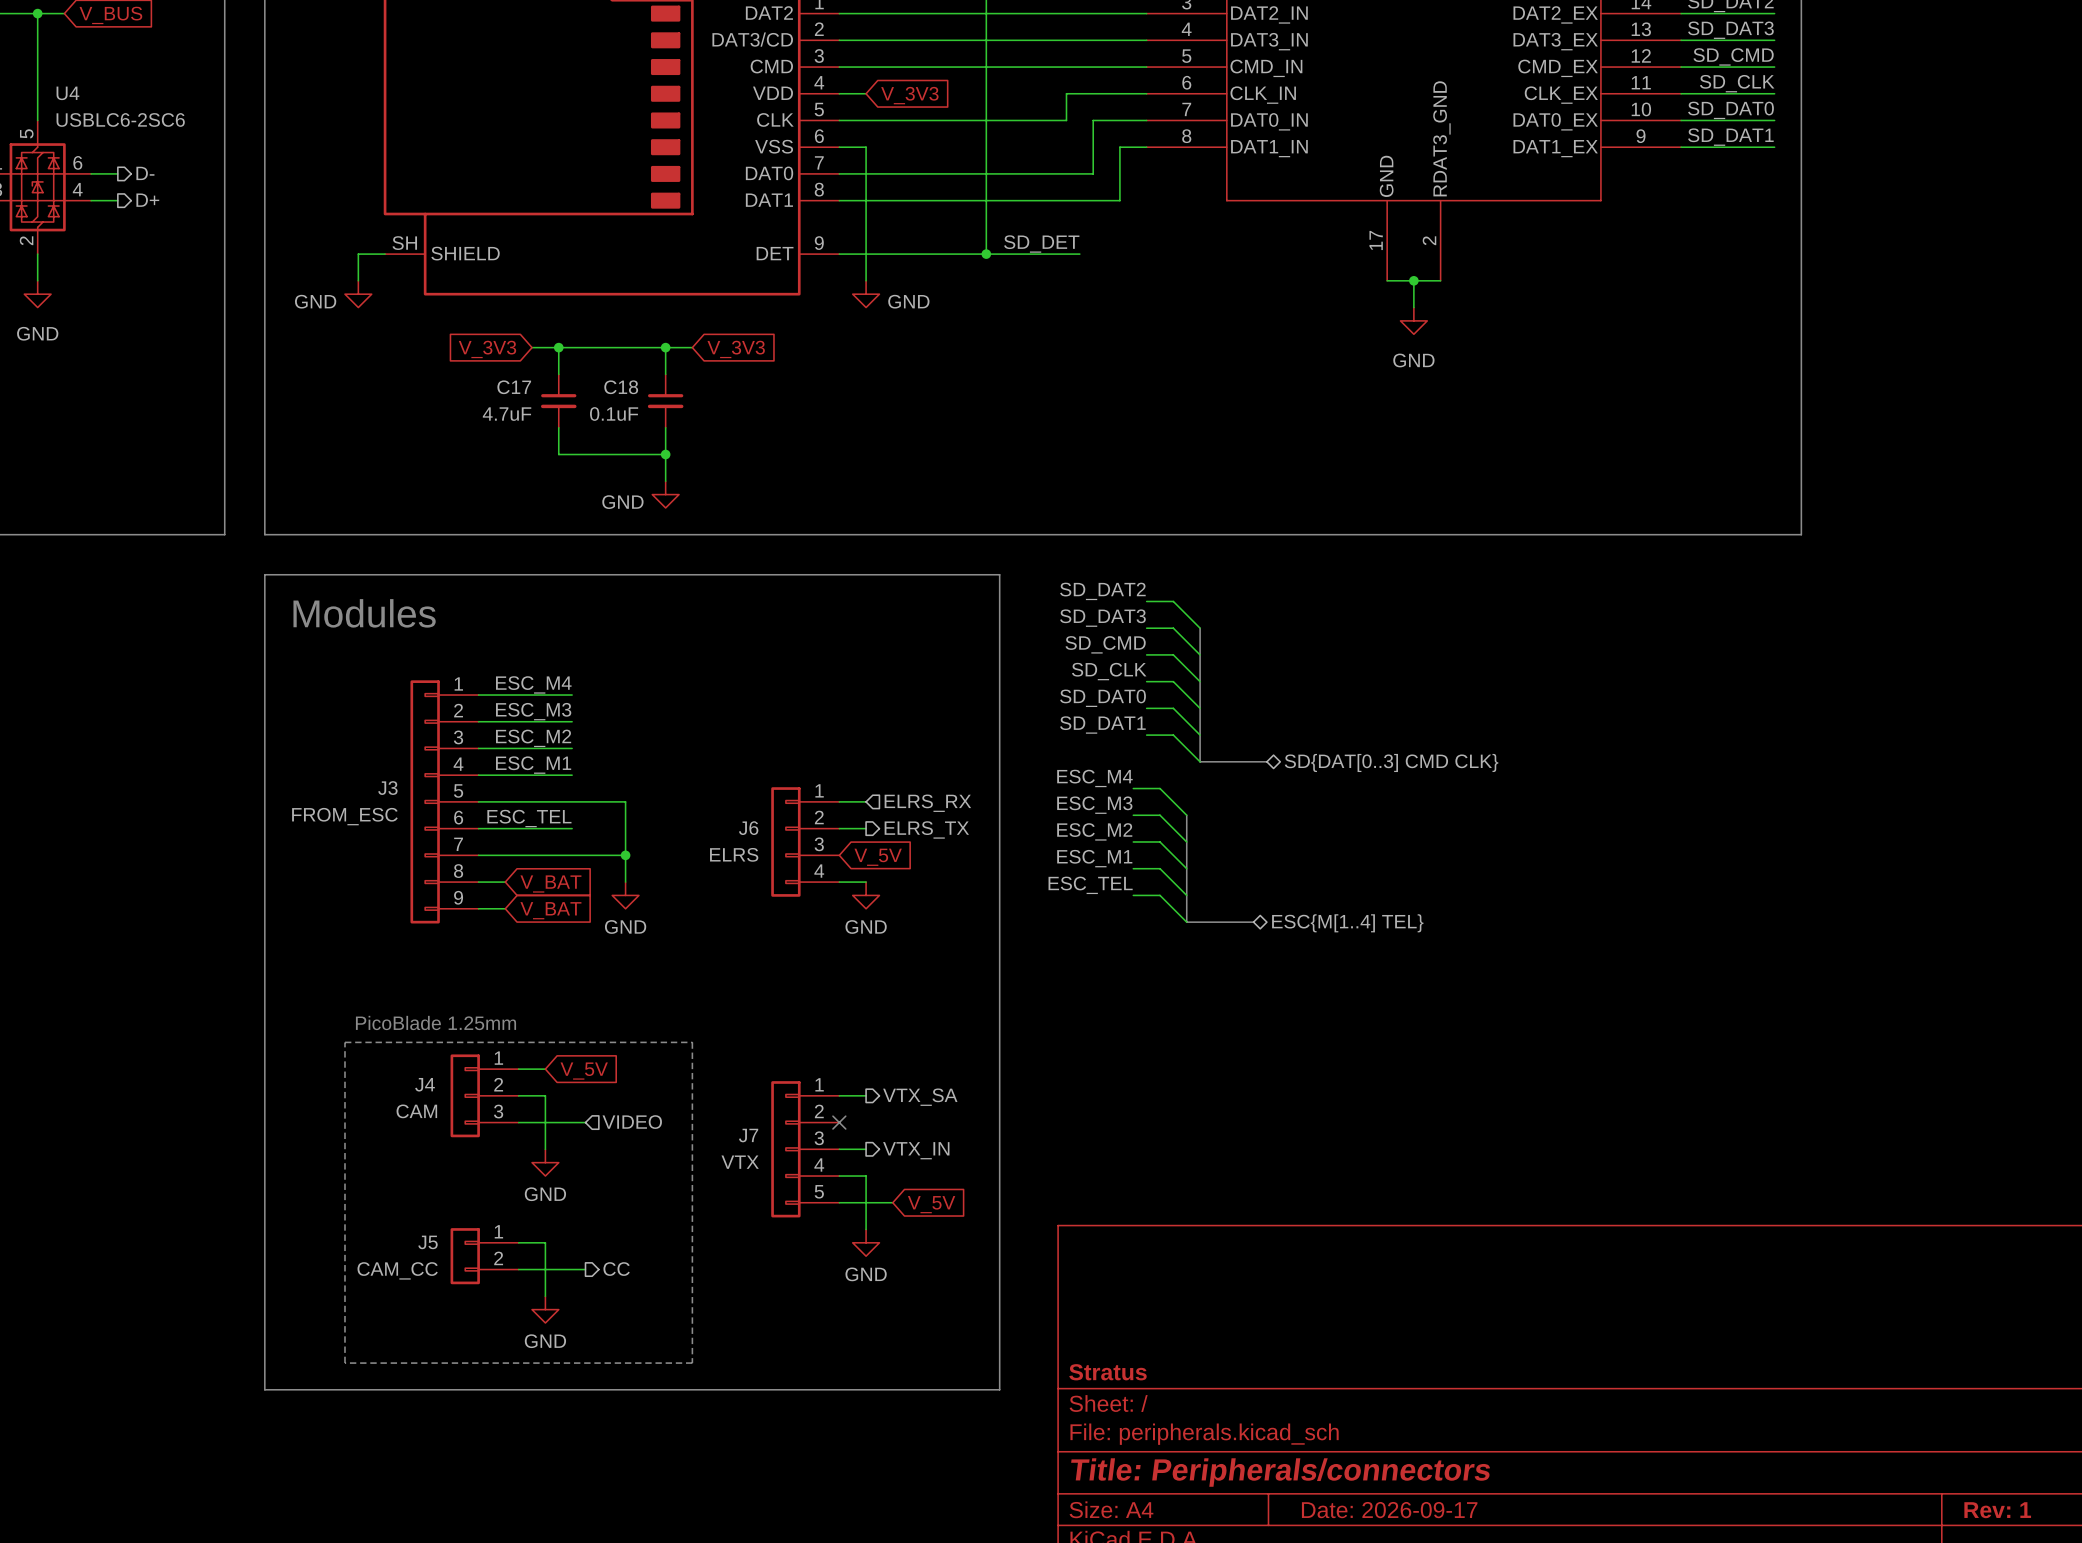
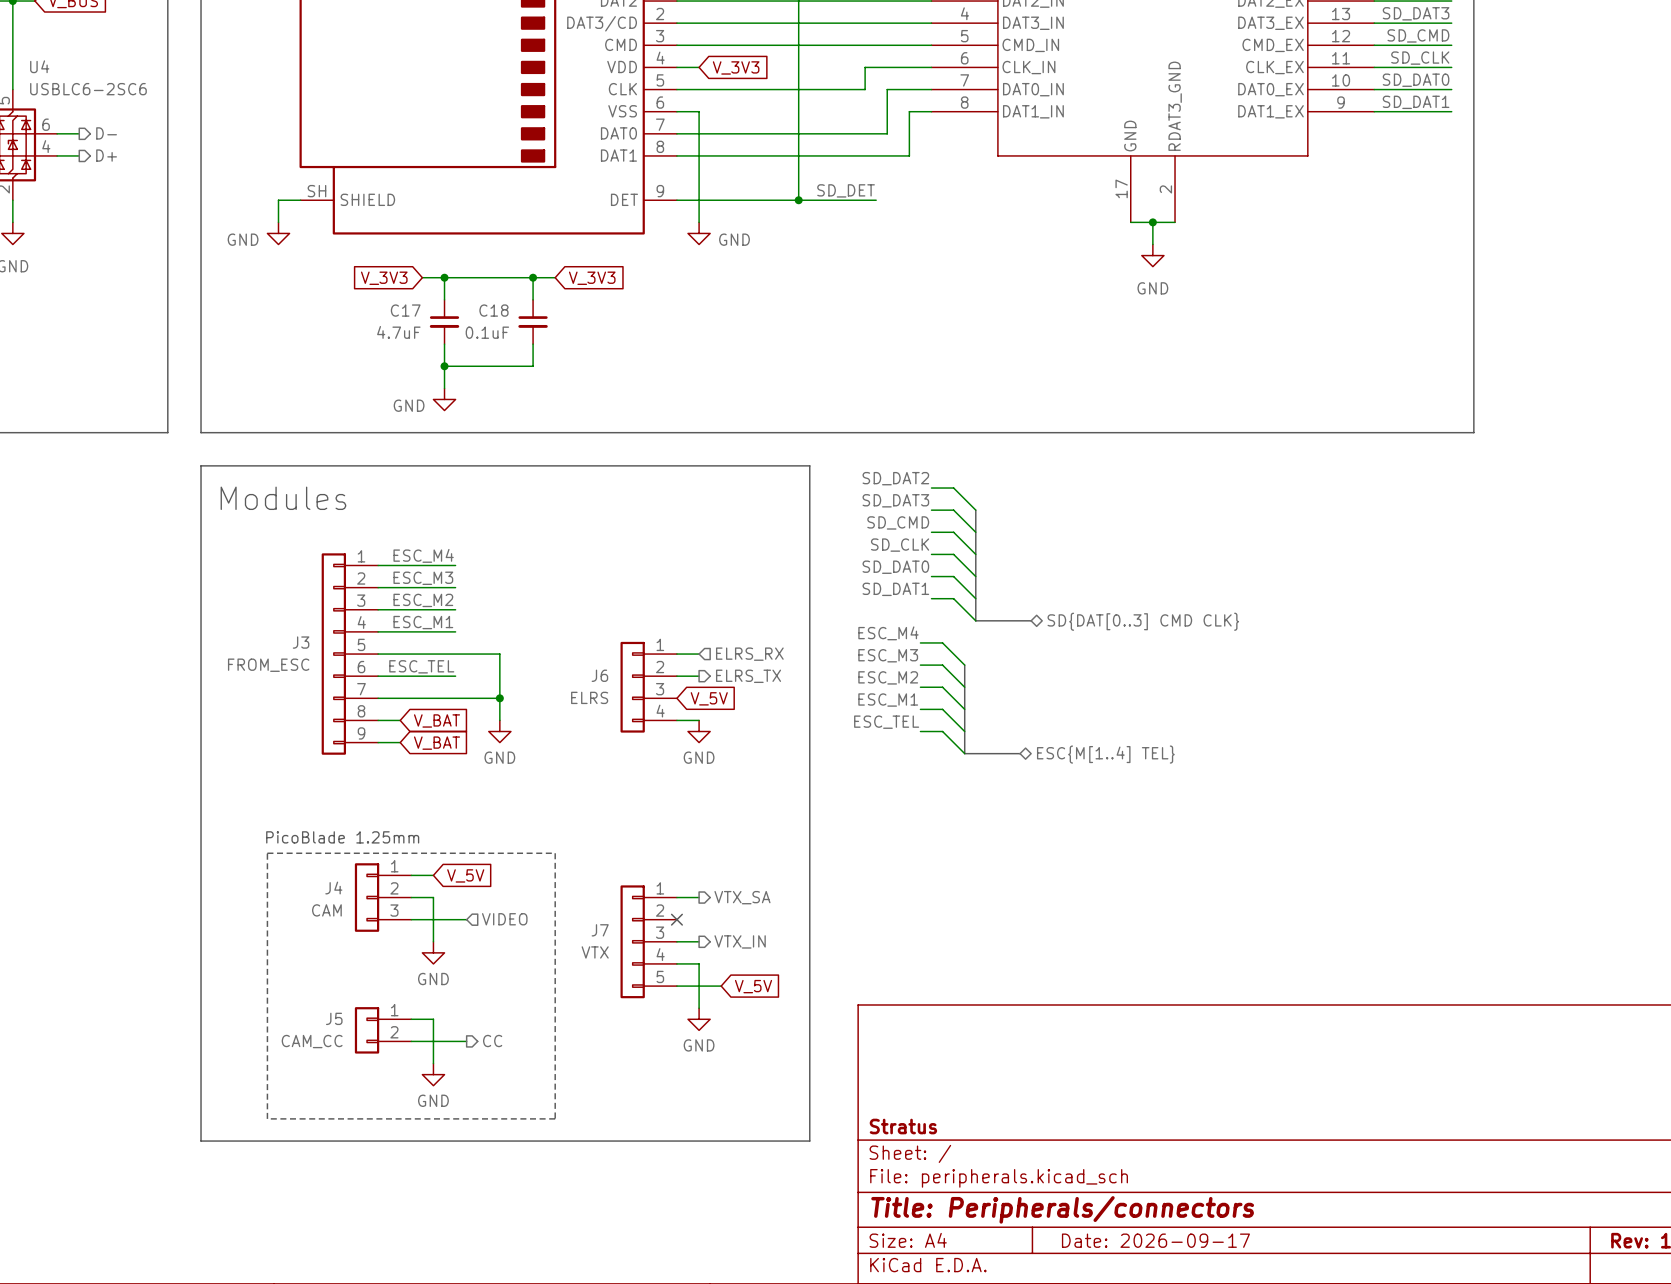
junction: none -> (444, 366)
wire: (665, 454) (665, 481) -> (444, 366) (444, 388)
junction: (665, 454) -> none
power symbol position: GND (665, 494) -> GND (444, 399)

